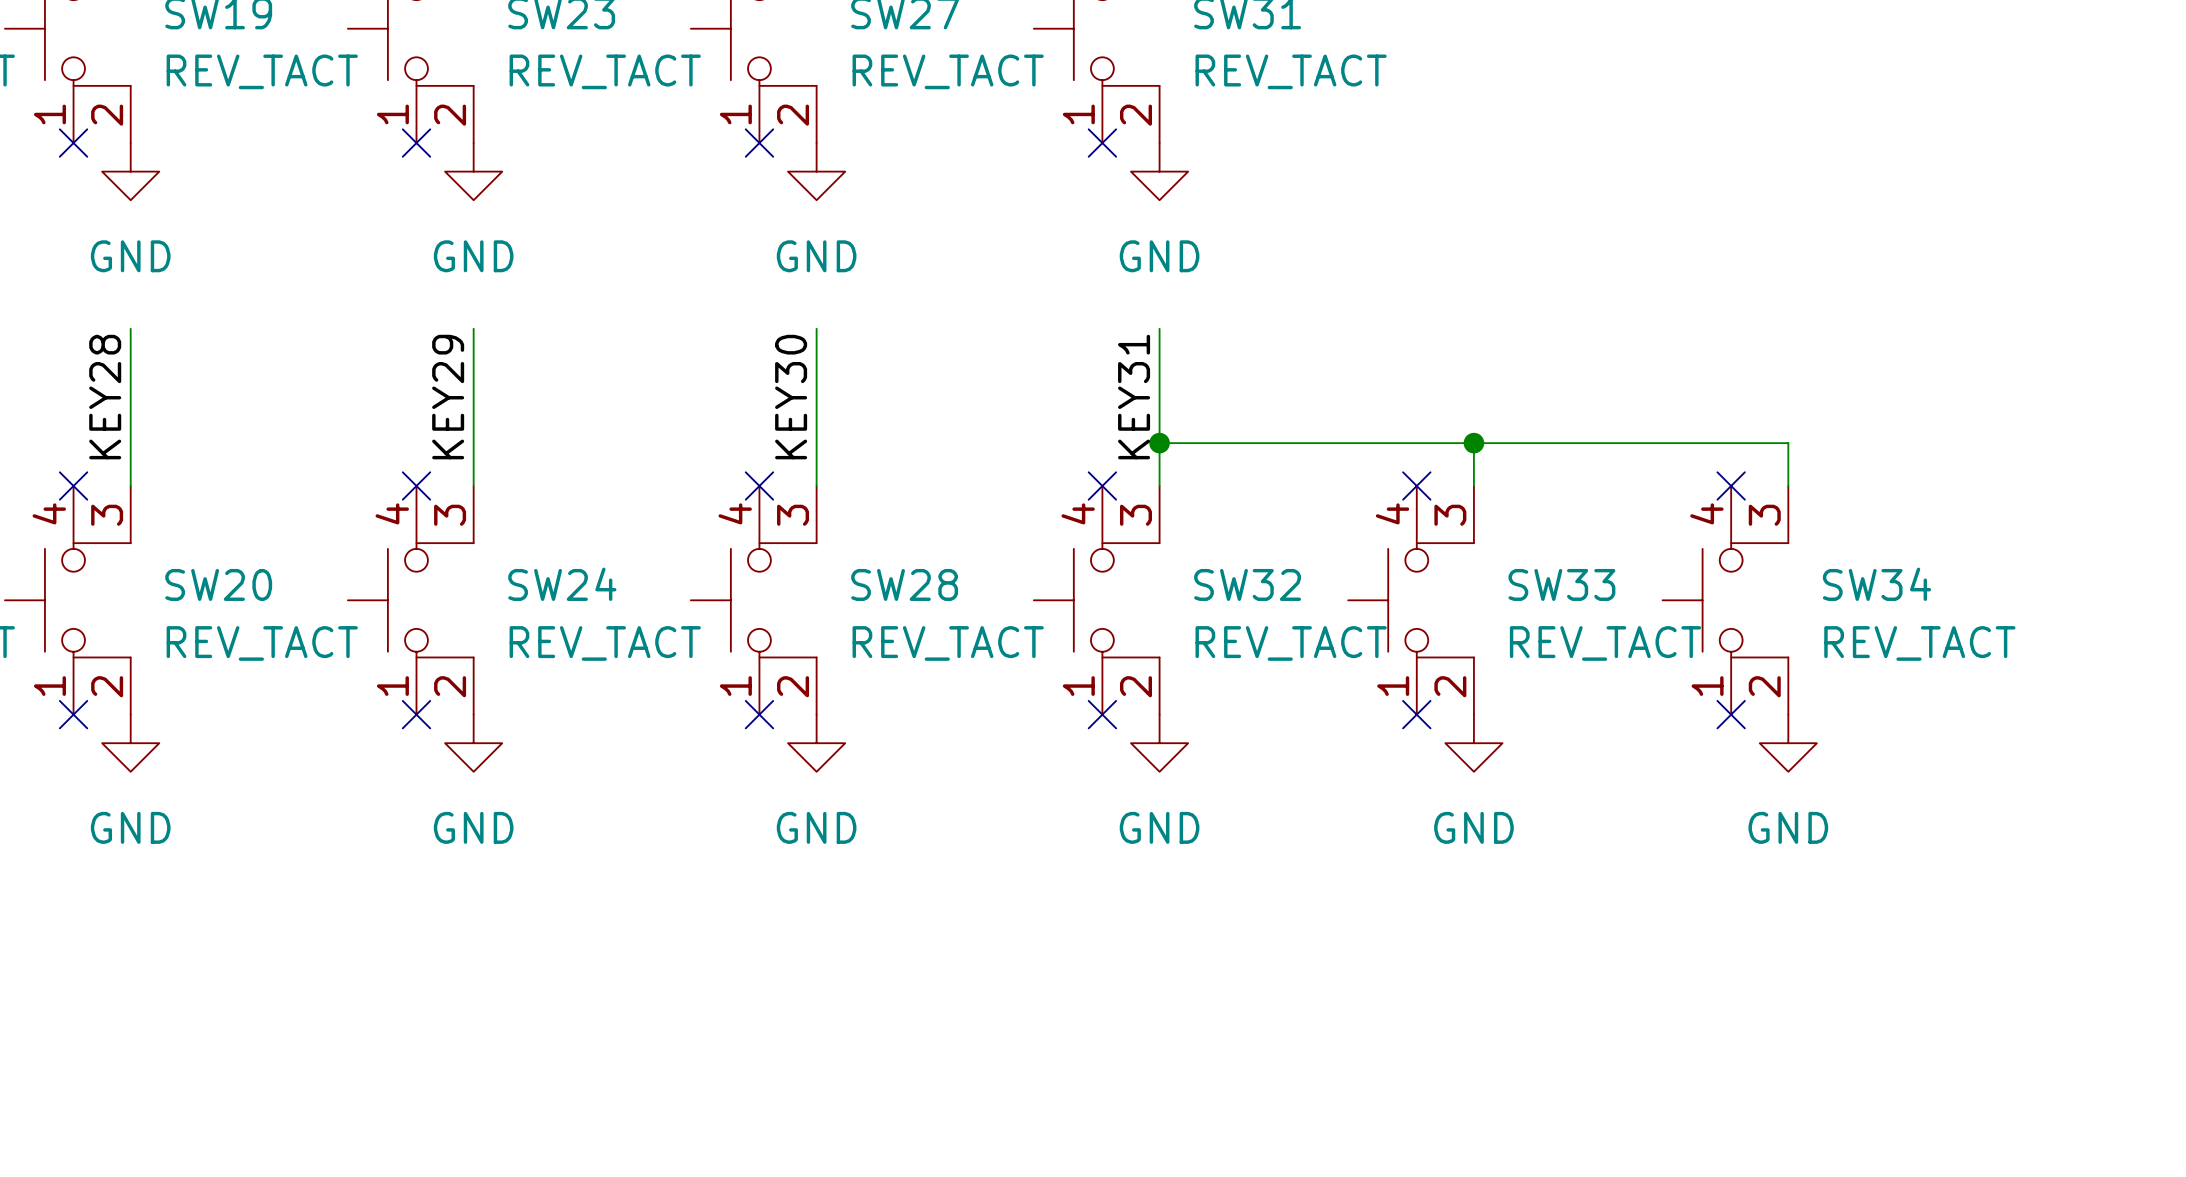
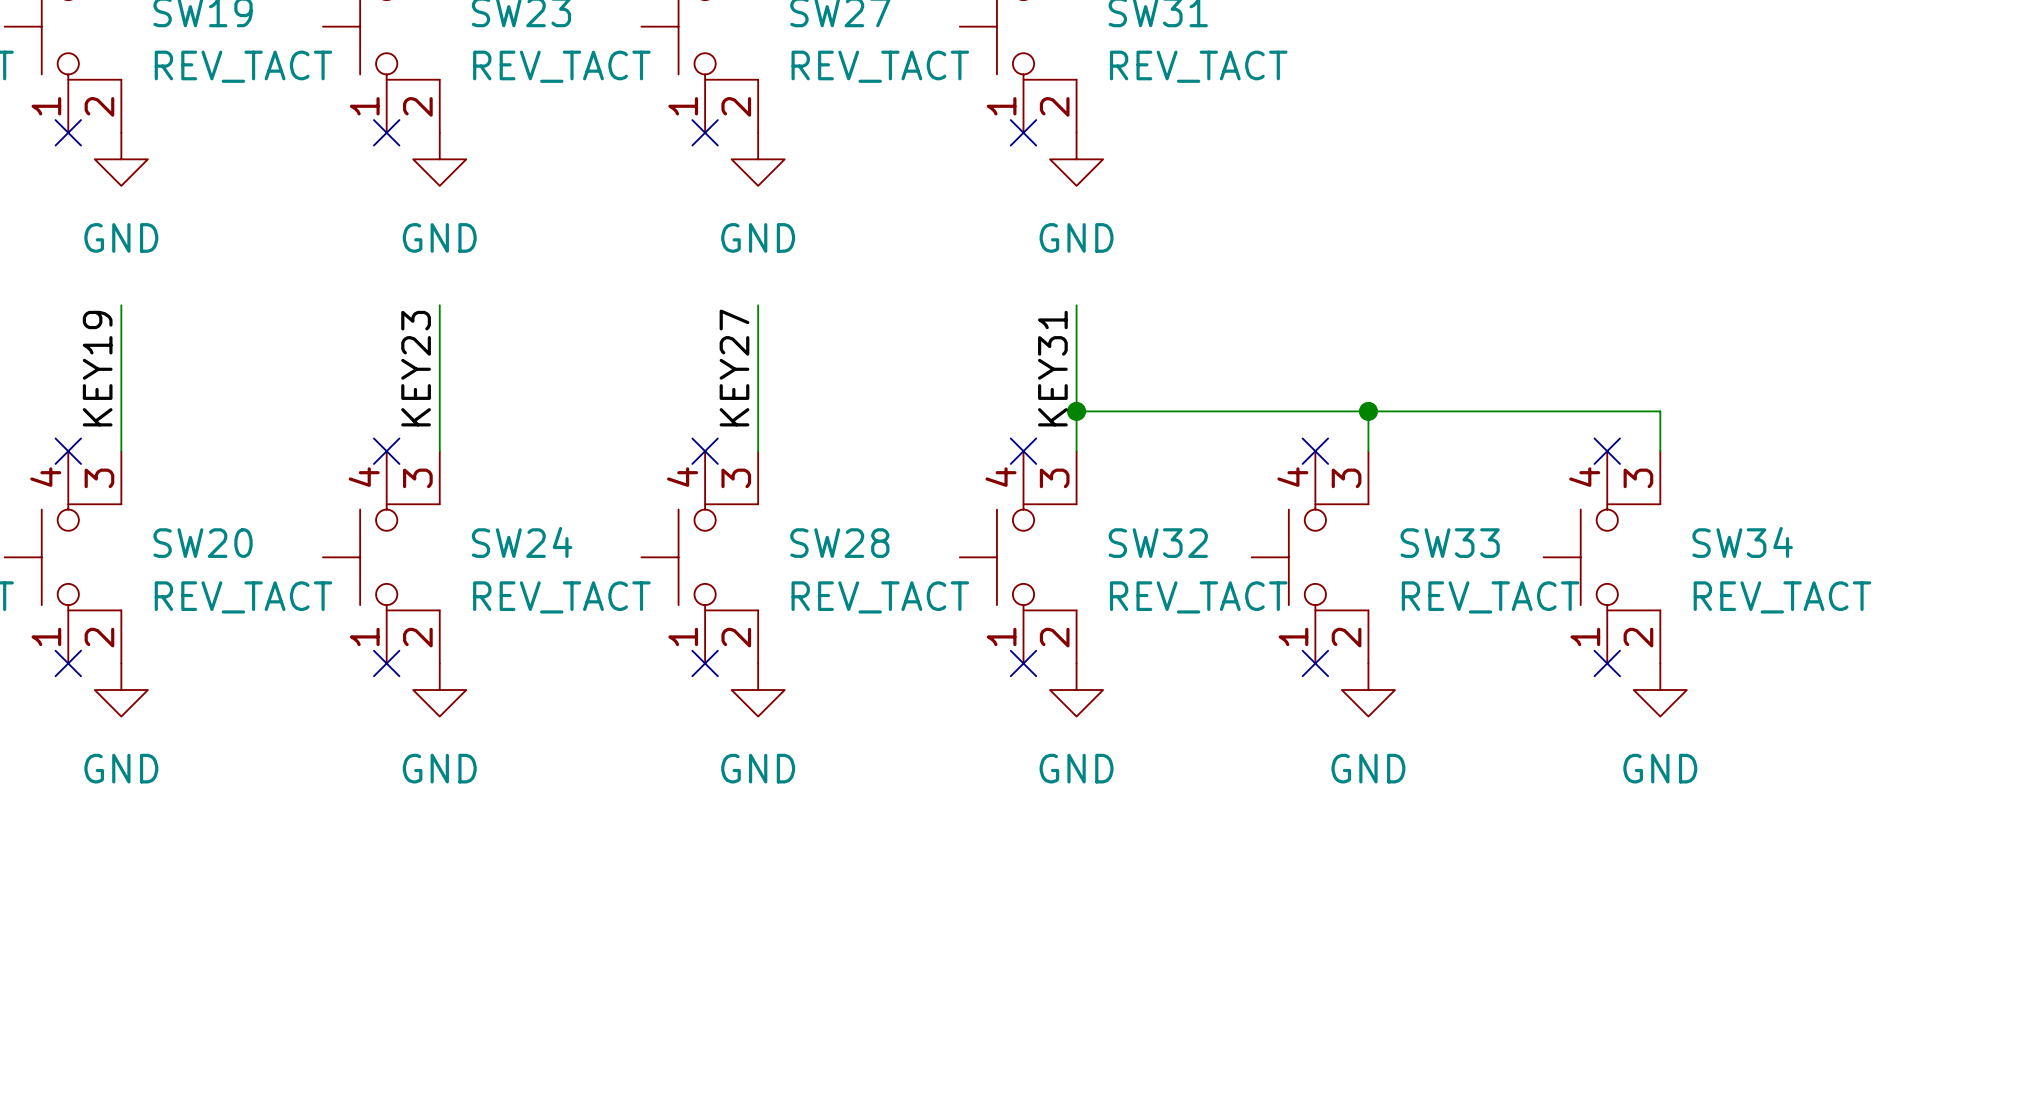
label: KEY28 (105, 397) -> KEY19 (97, 368)
label: KEY29 (448, 397) -> KEY23 (416, 368)
label: KEY30 (791, 397) -> KEY27 (734, 368)

